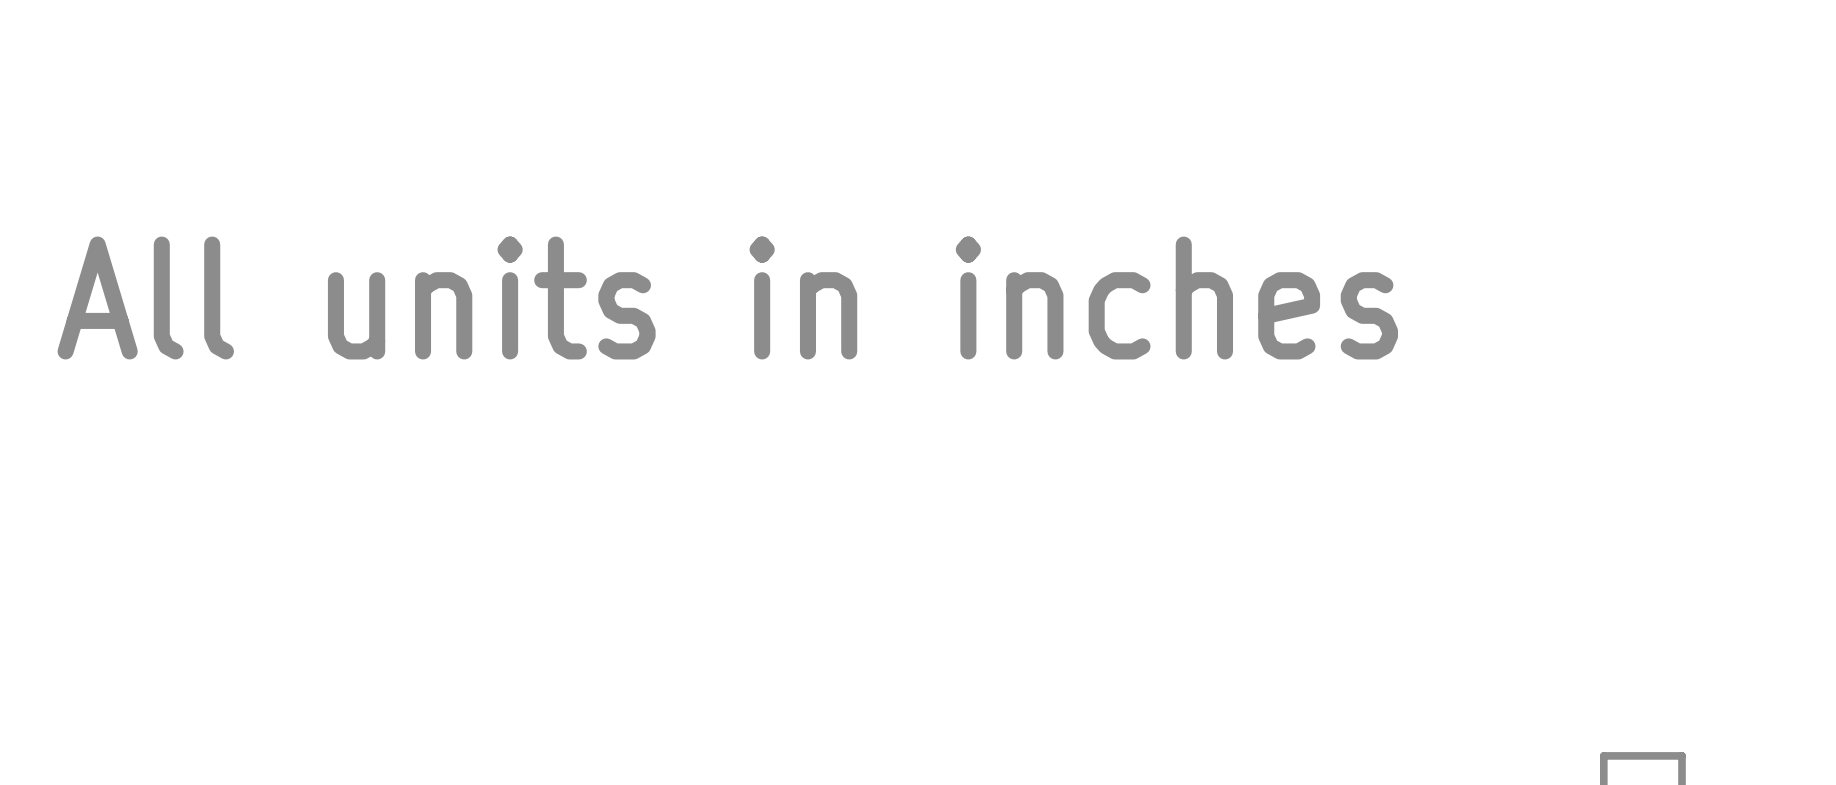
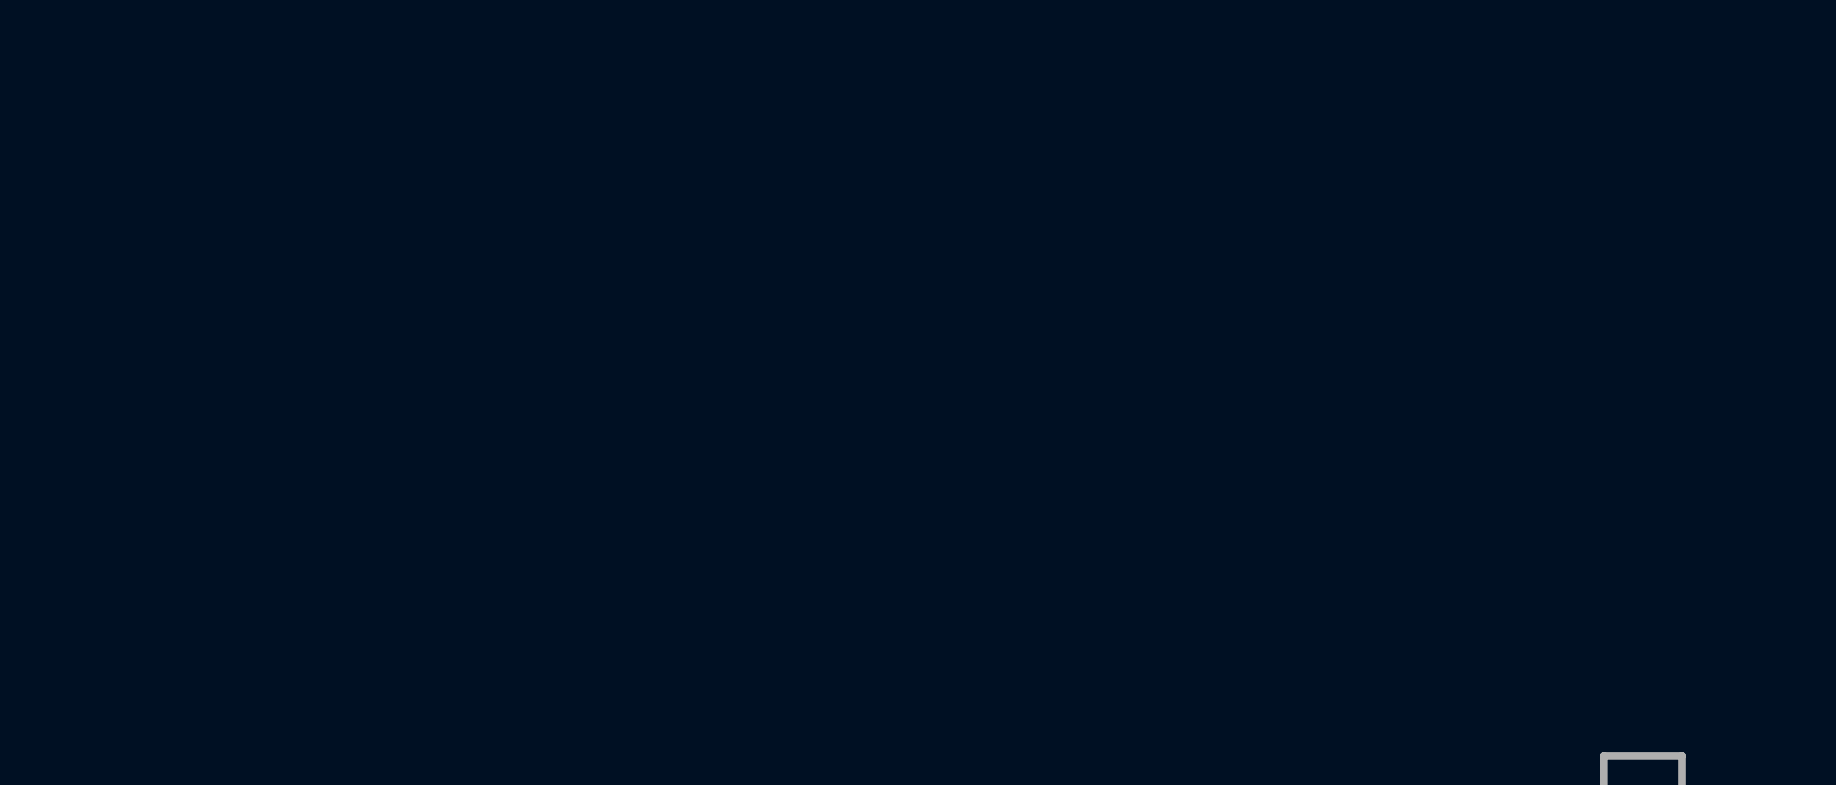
text: All units in inches (727, 298) -> none

